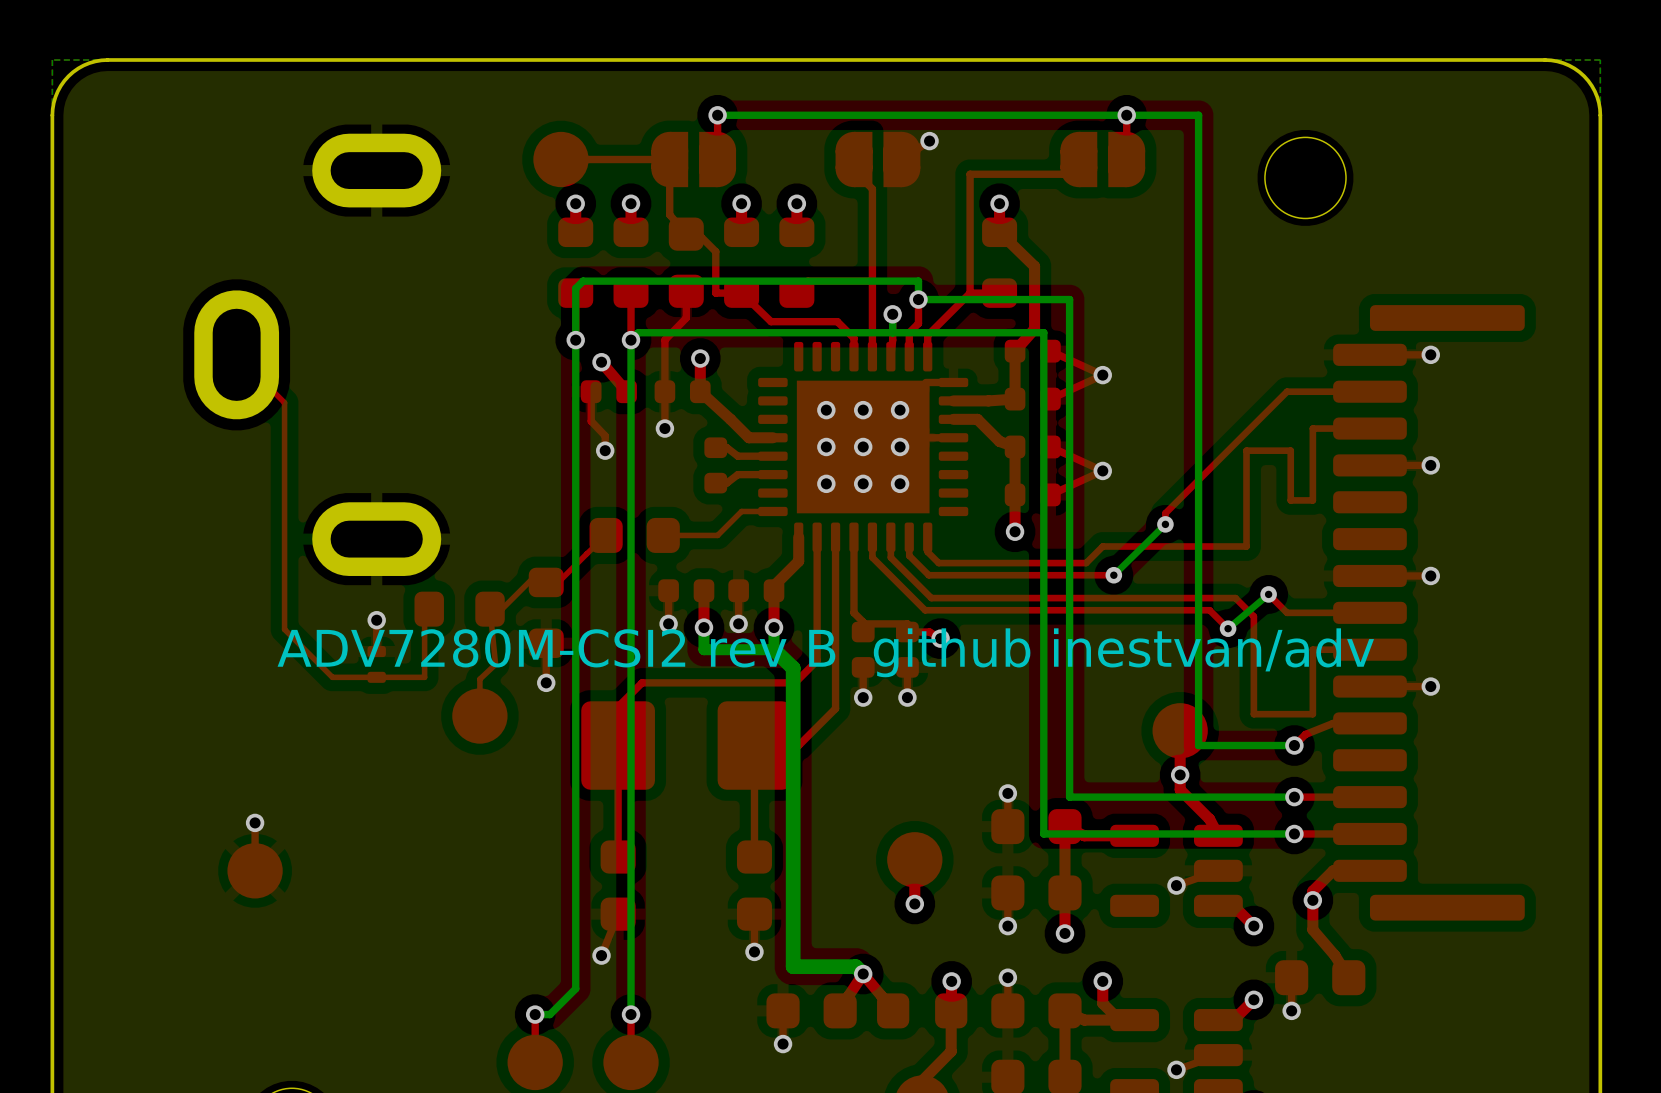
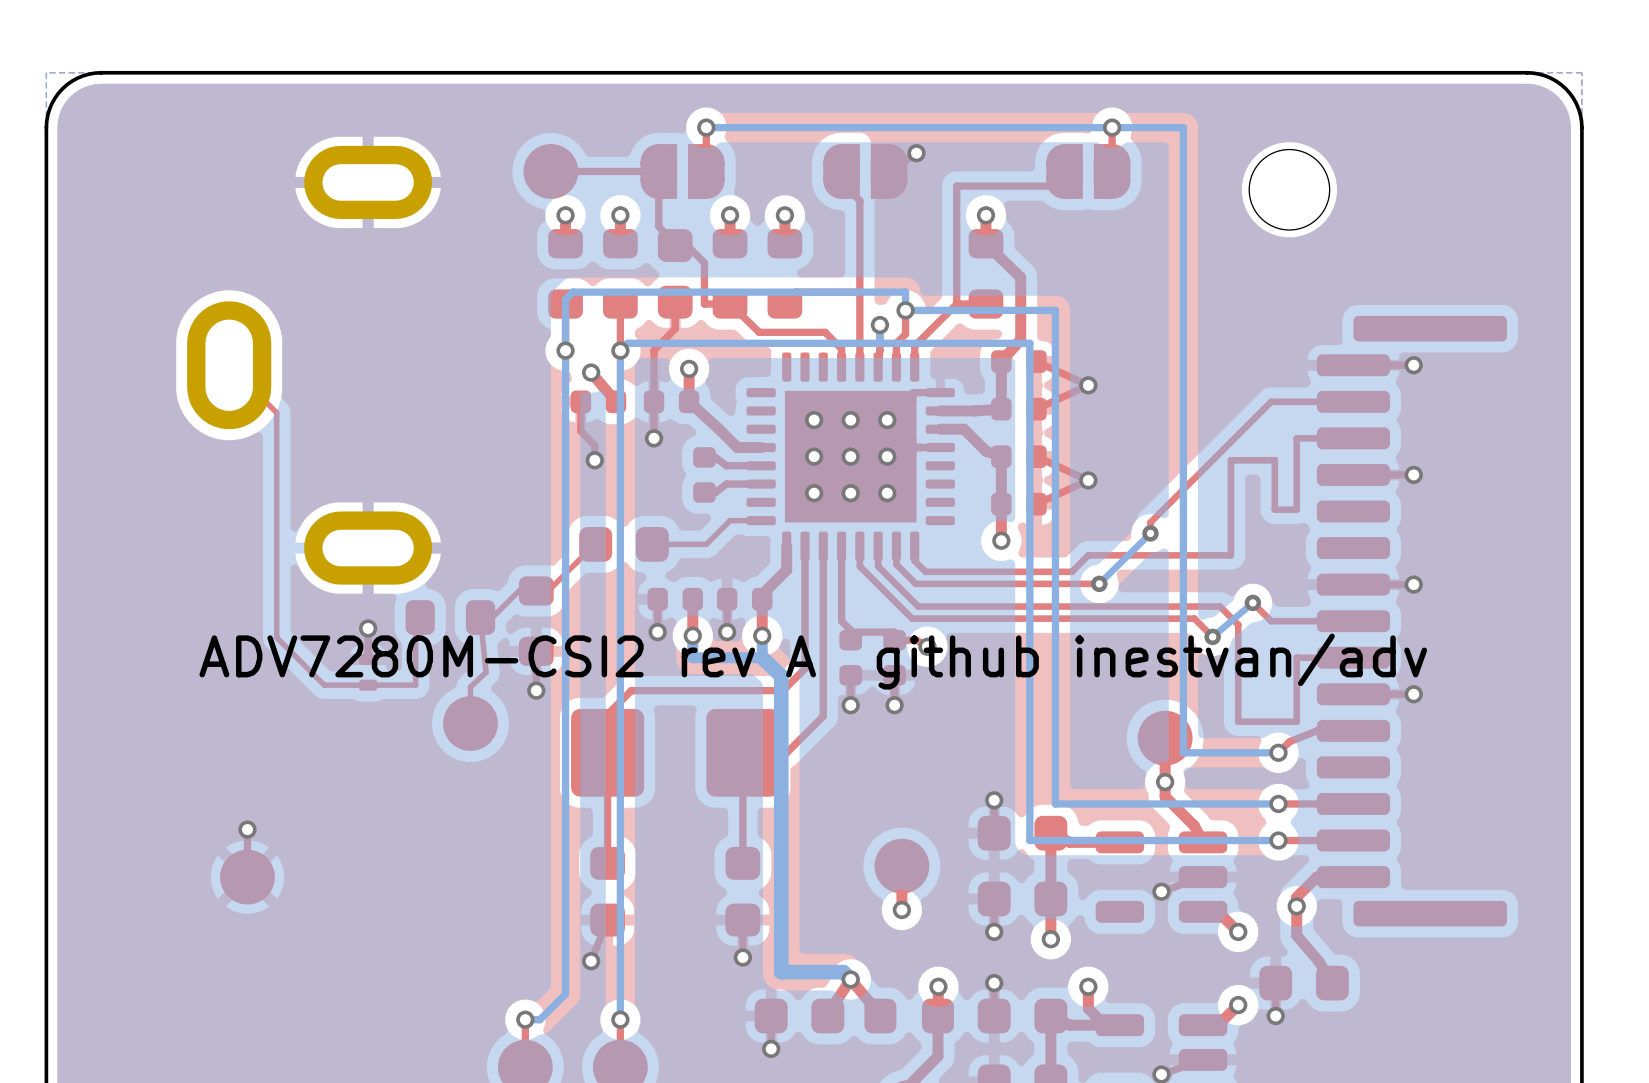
text: ADV7280M-CSI2 rev B github inestvan/adv (825, 652) -> ADV7280M-CSI2 rev A github inestvan/adv (813, 661)

